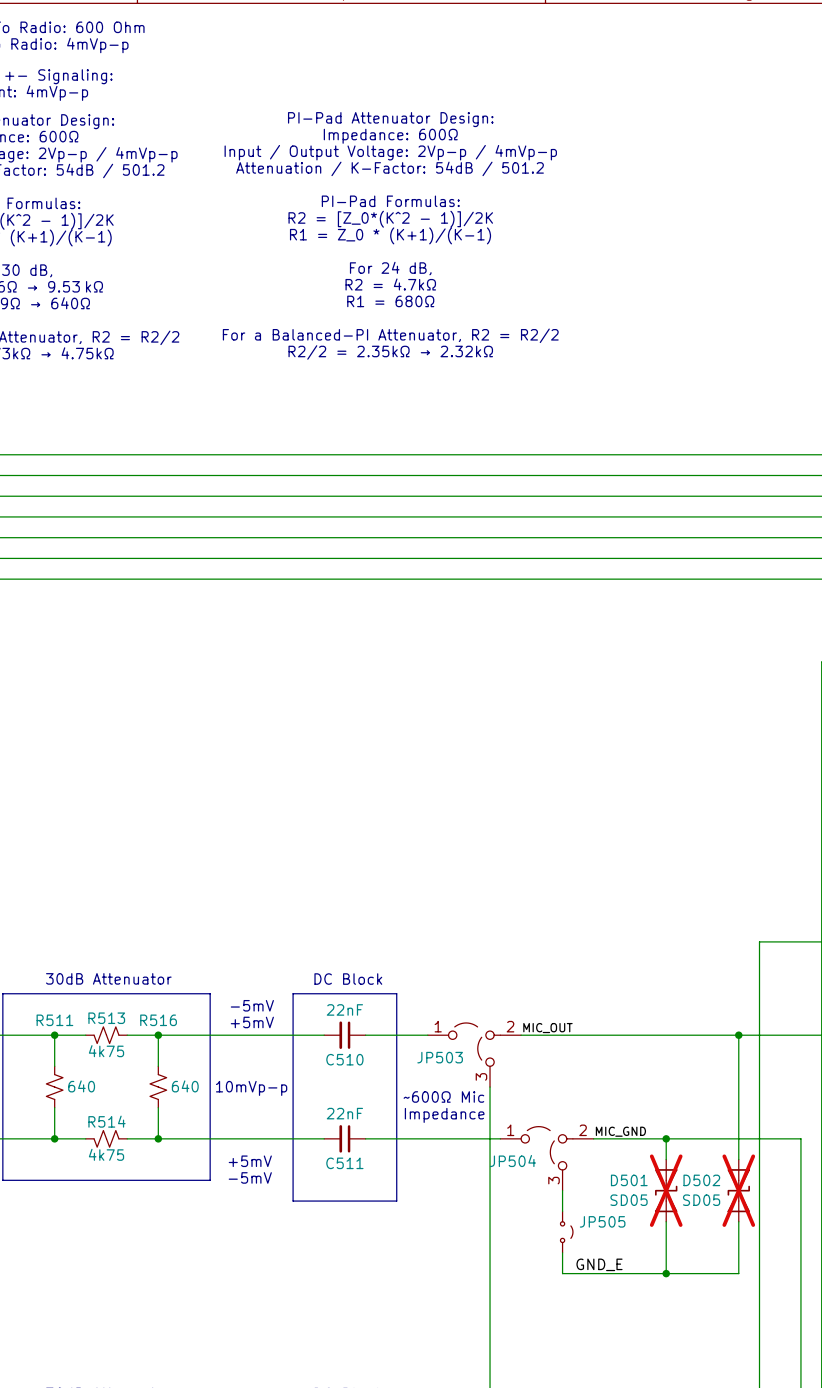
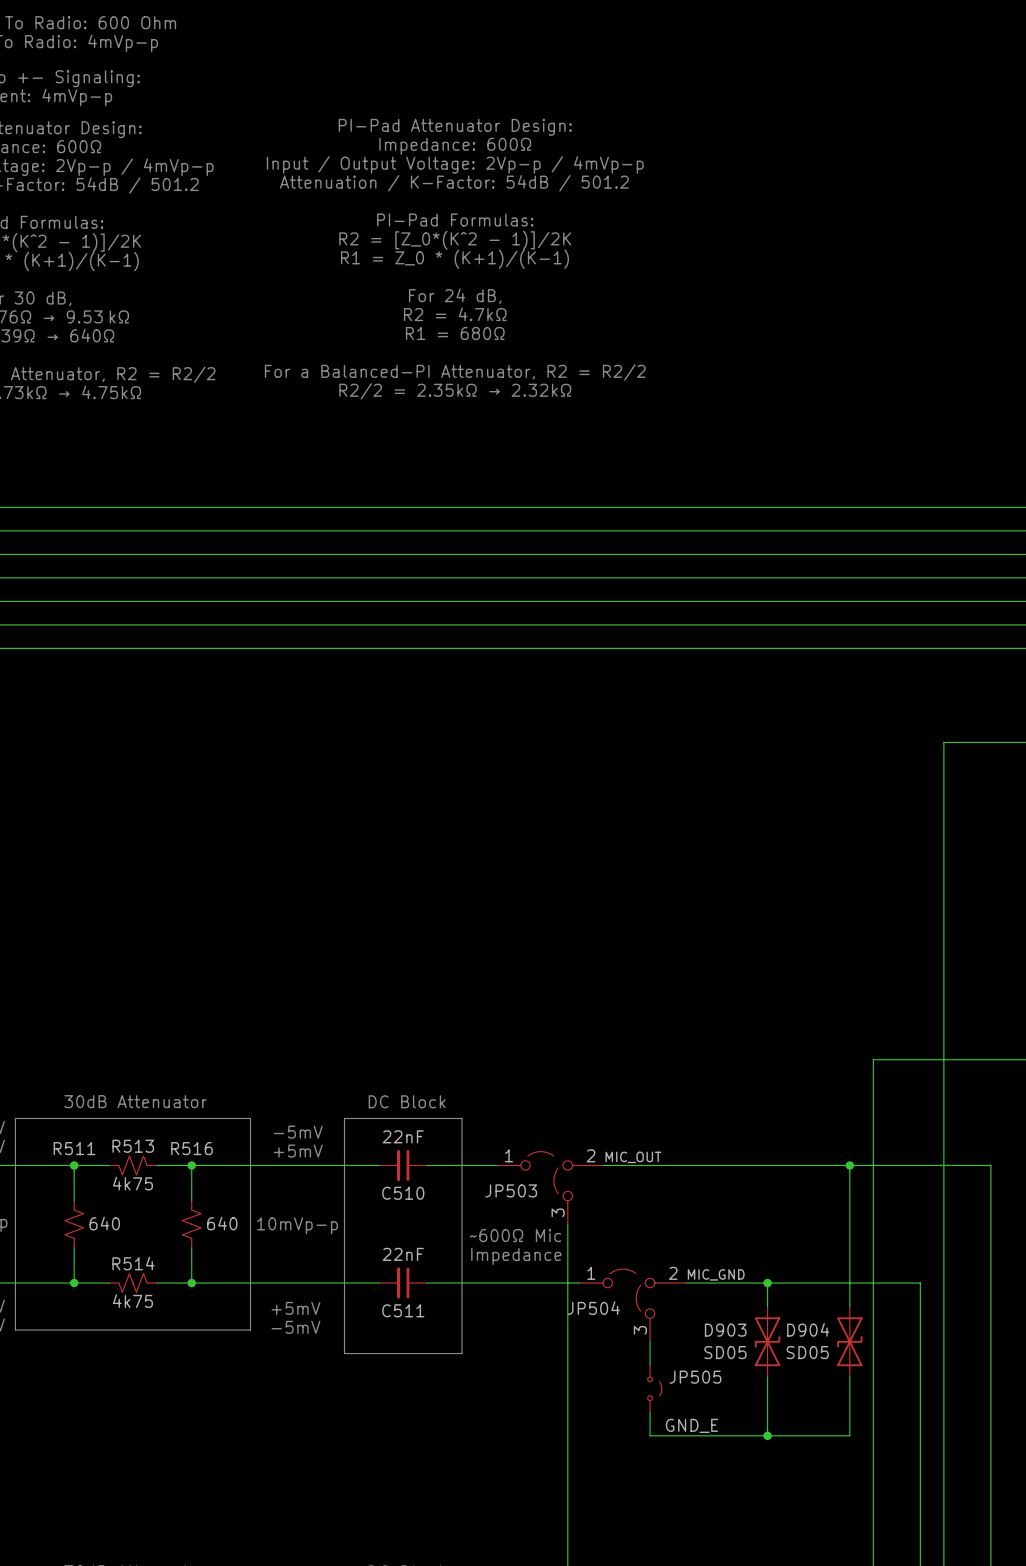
D501 name: D501 (629, 1180) -> D903 (725, 1330)
D502 name: D502 (701, 1180) -> D904 (808, 1329)
D501 do-not-place cross: (666, 1190) -> none
D502 do-not-place cross: (738, 1190) -> none

